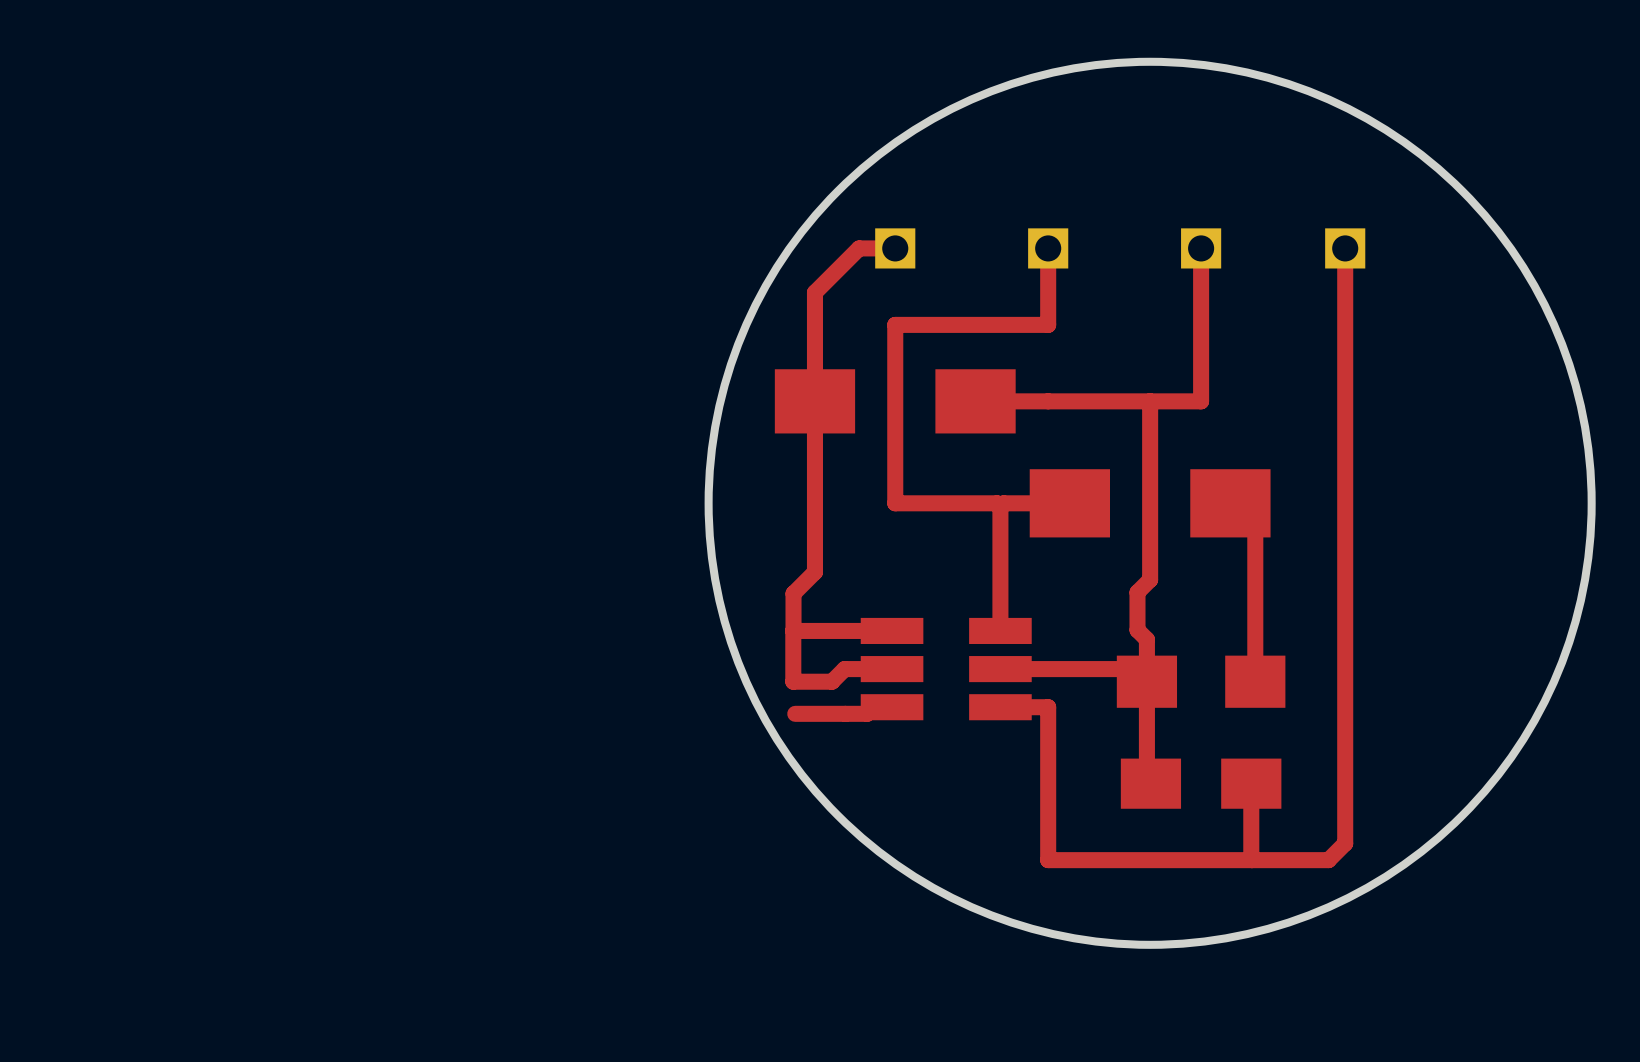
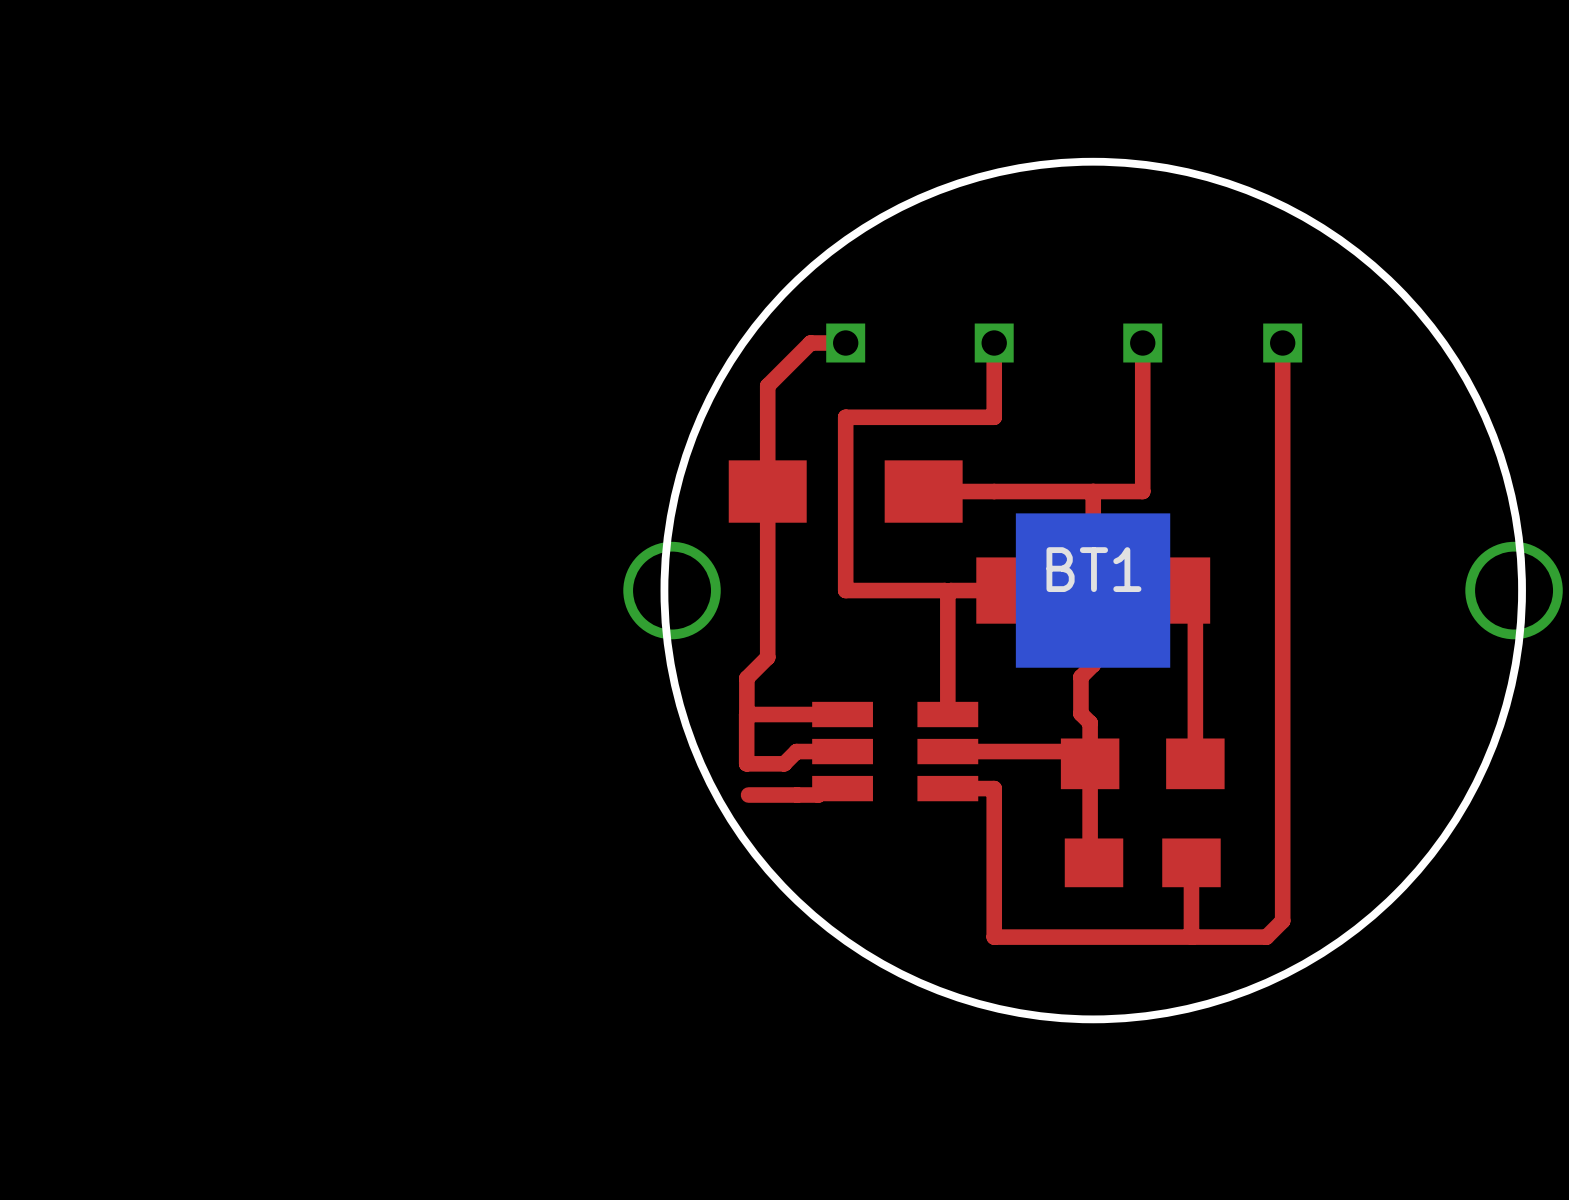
BT1: none -> (1093, 590)

